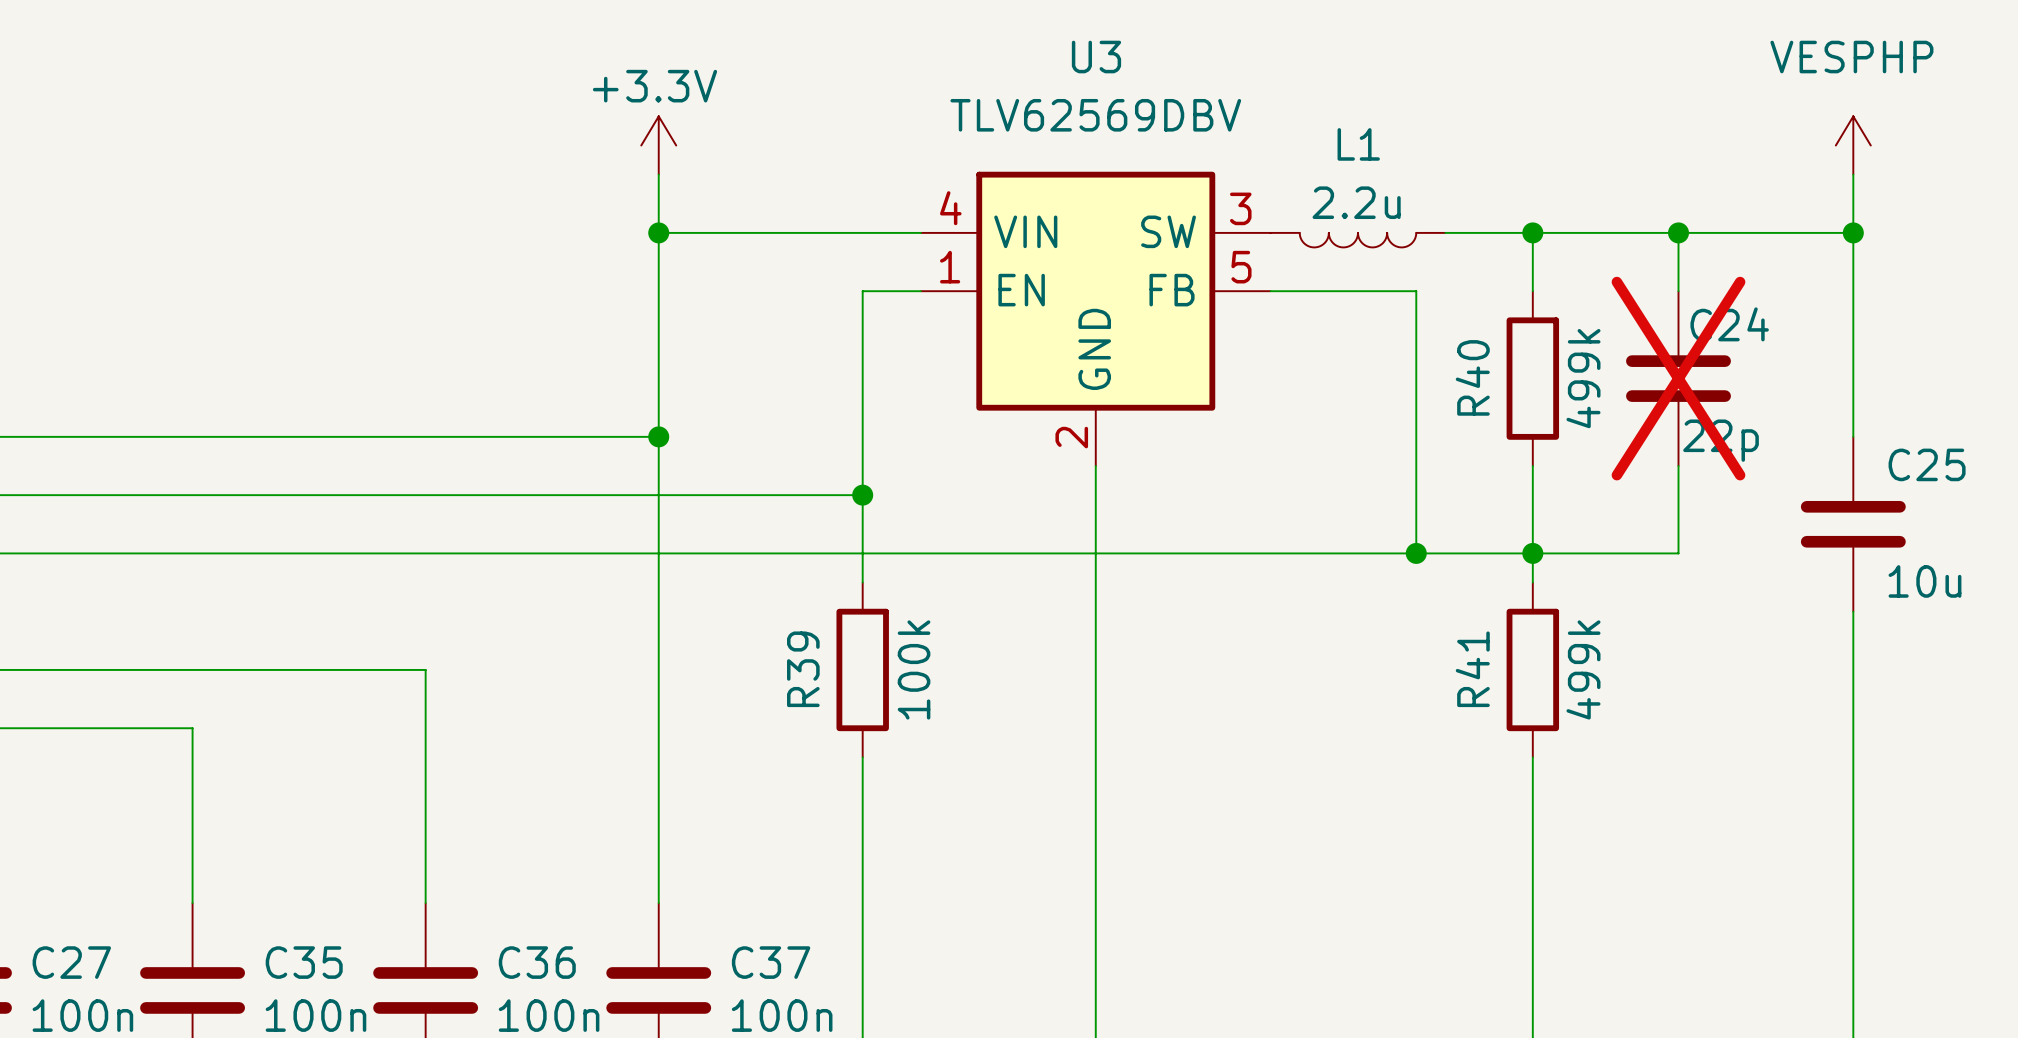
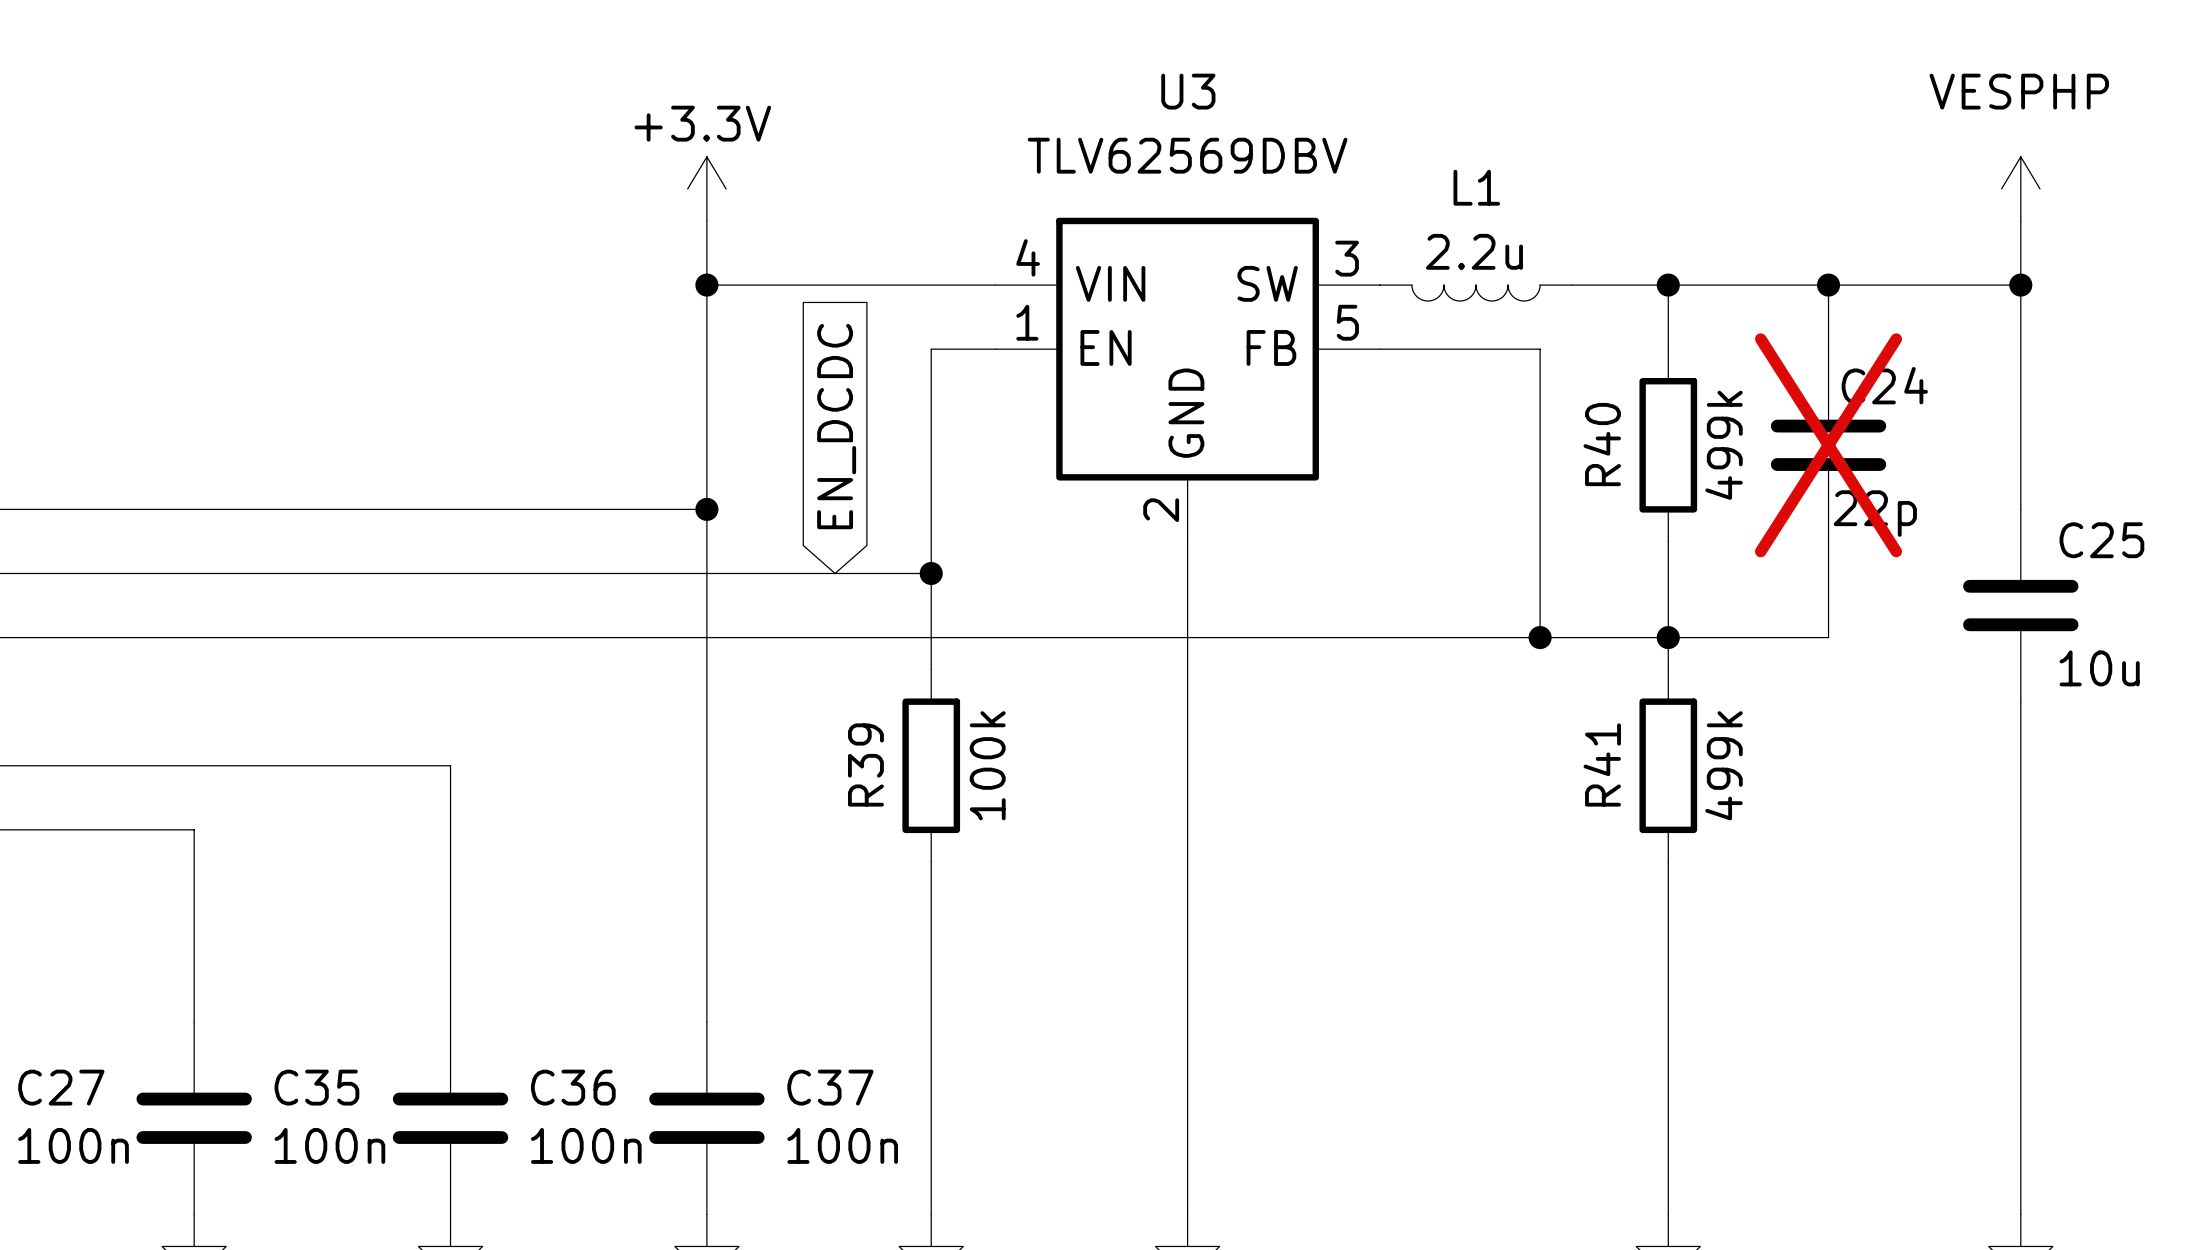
global label: none -> EN_DCDC (836, 426)

